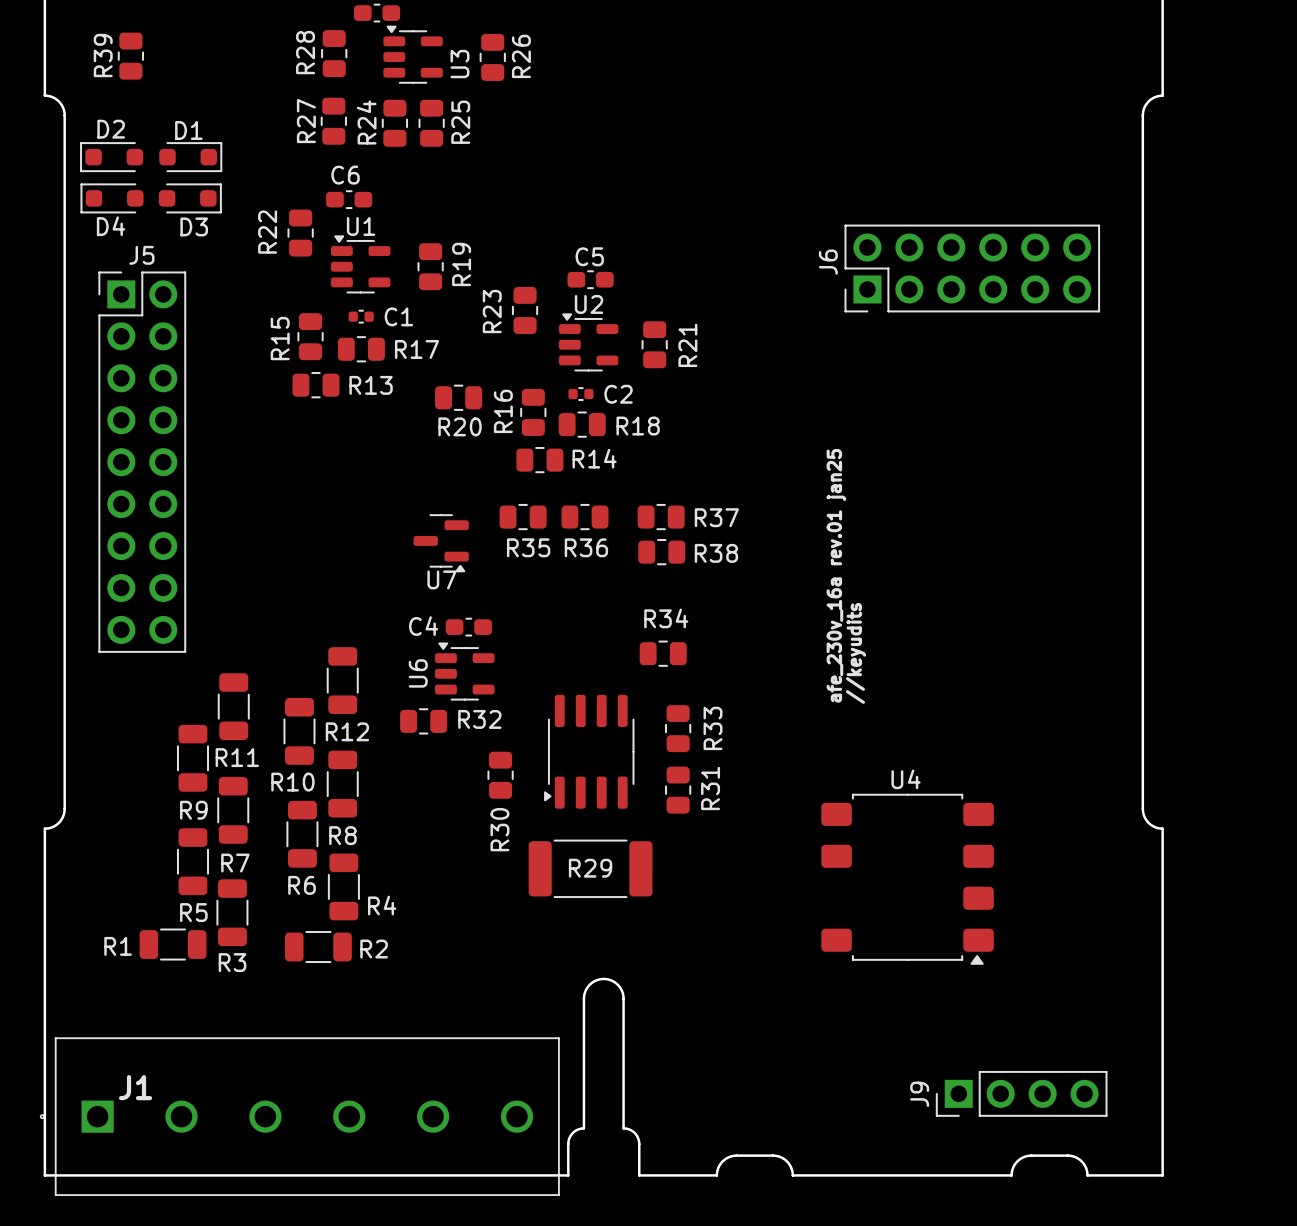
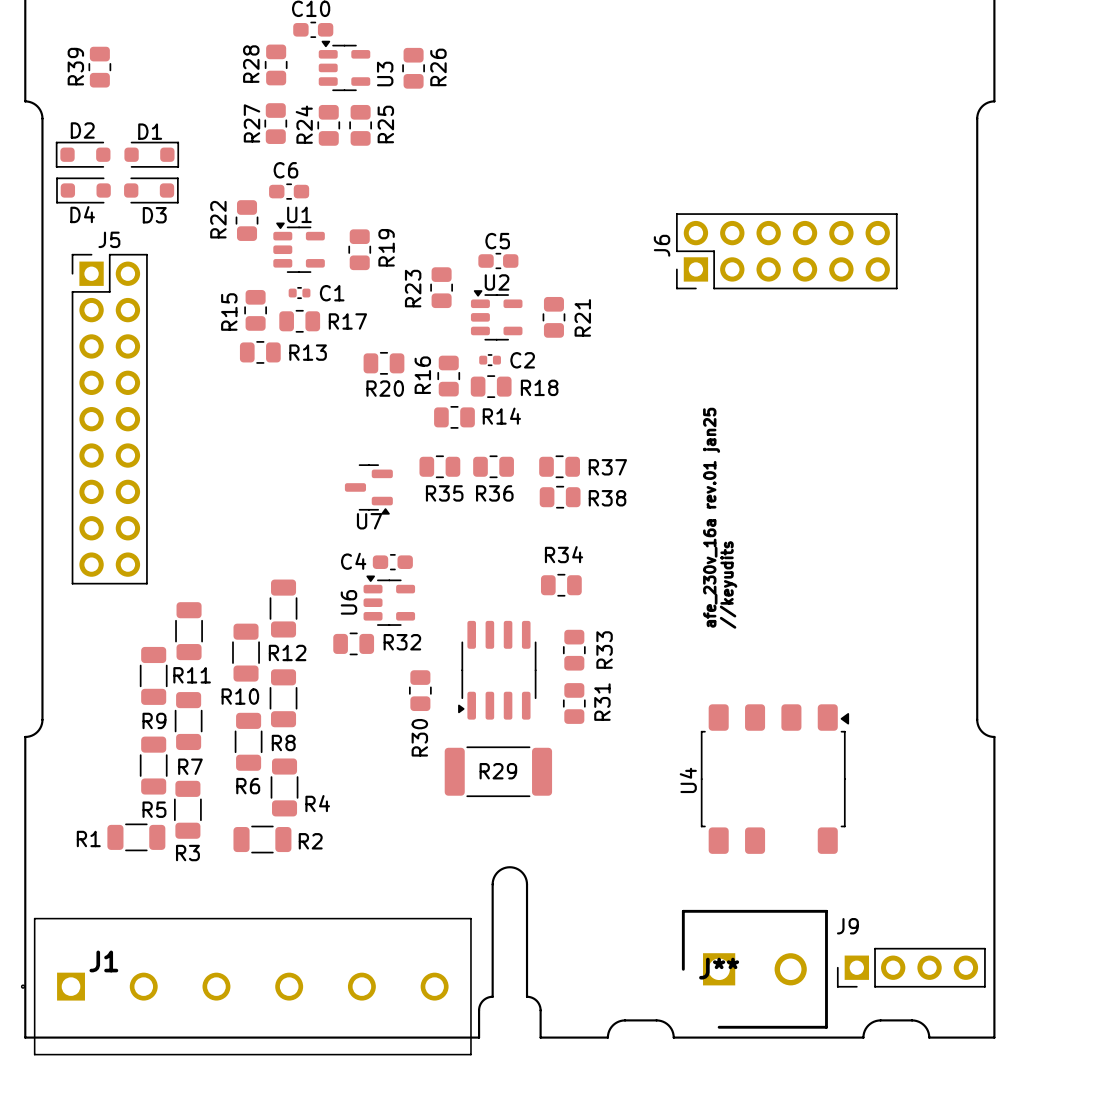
J6 position: (972, 268) -> (786, 251)
U4 rotation: 0° (907, 879) -> 90° counterclockwise (774, 779)
J9 position: (1021, 1093) -> (911, 967)
J9 name rotation: 0° (919, 1094) -> 90° clockwise (847, 926)
J9 name position: J9 (919, 1094) -> J9 (847, 926)
J**: none -> (754, 969)

